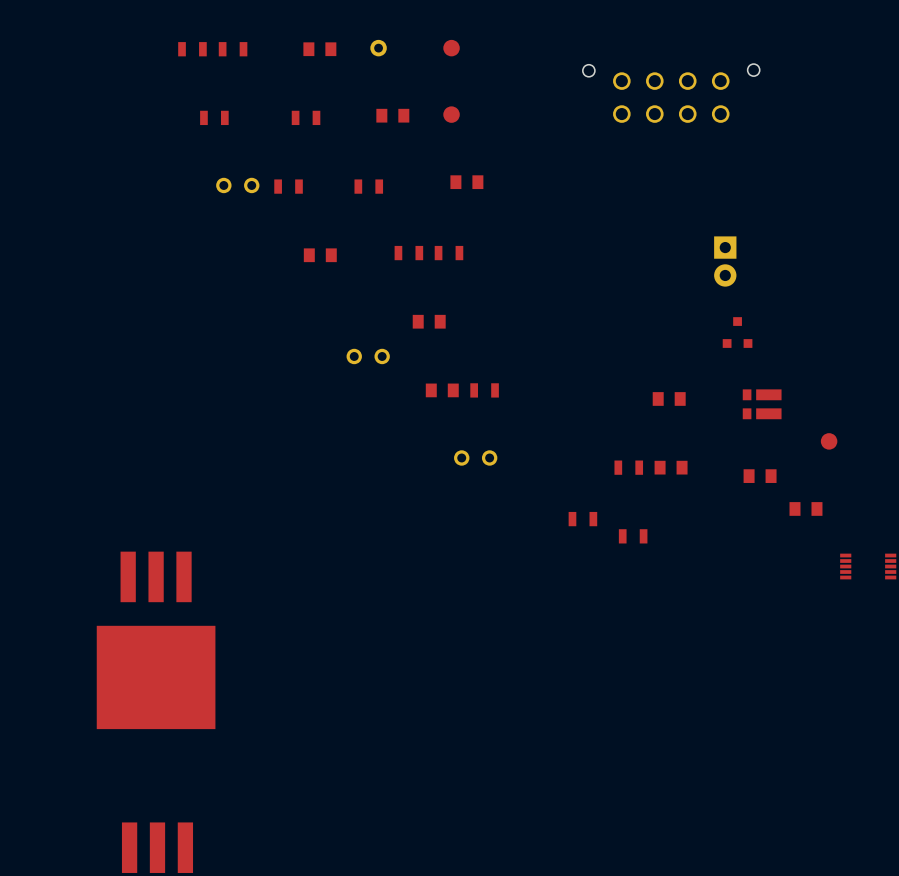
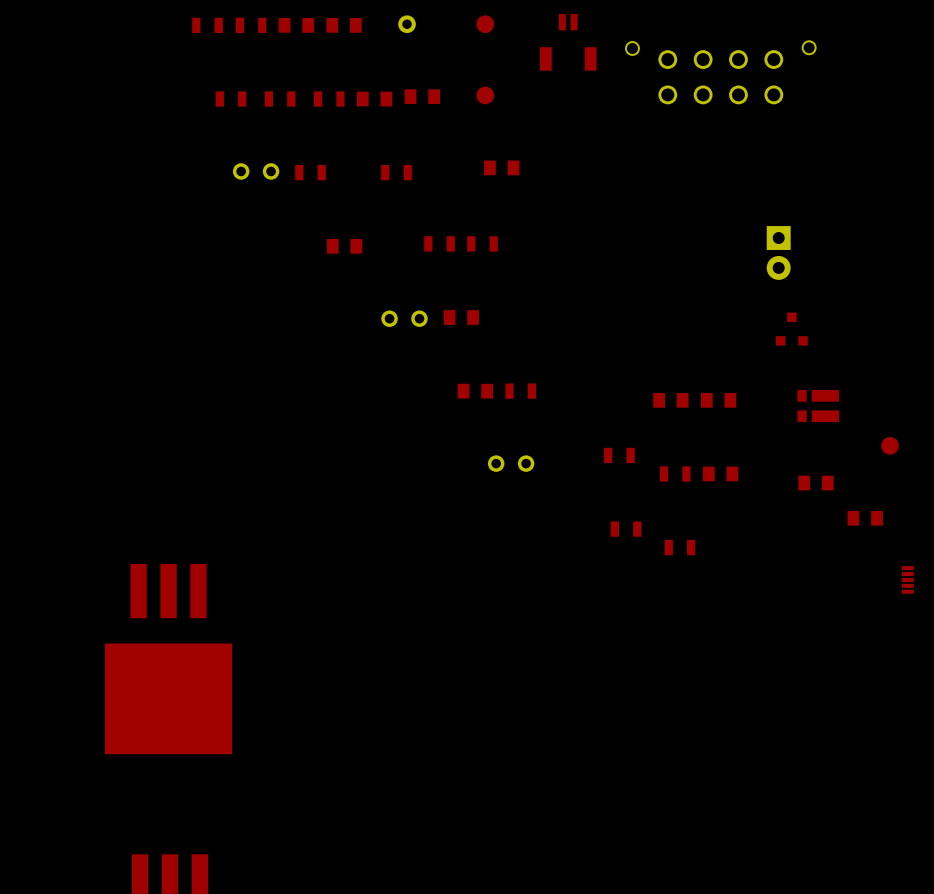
part: none -> (296, 25)
part: none -> (568, 42)
part: none -> (280, 99)
part: none -> (374, 99)
part position: (368, 356) -> (404, 318)
part: none -> (670, 400)
part: none -> (619, 455)

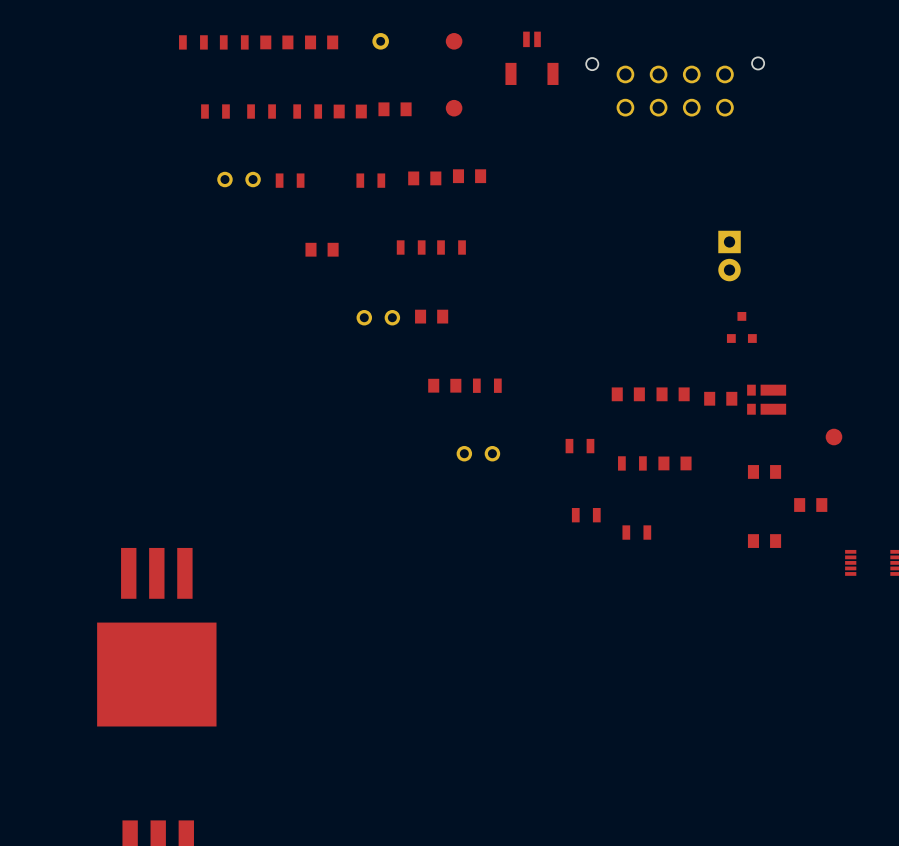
part: none -> (424, 178)
part: none -> (720, 398)
part: none -> (764, 541)

